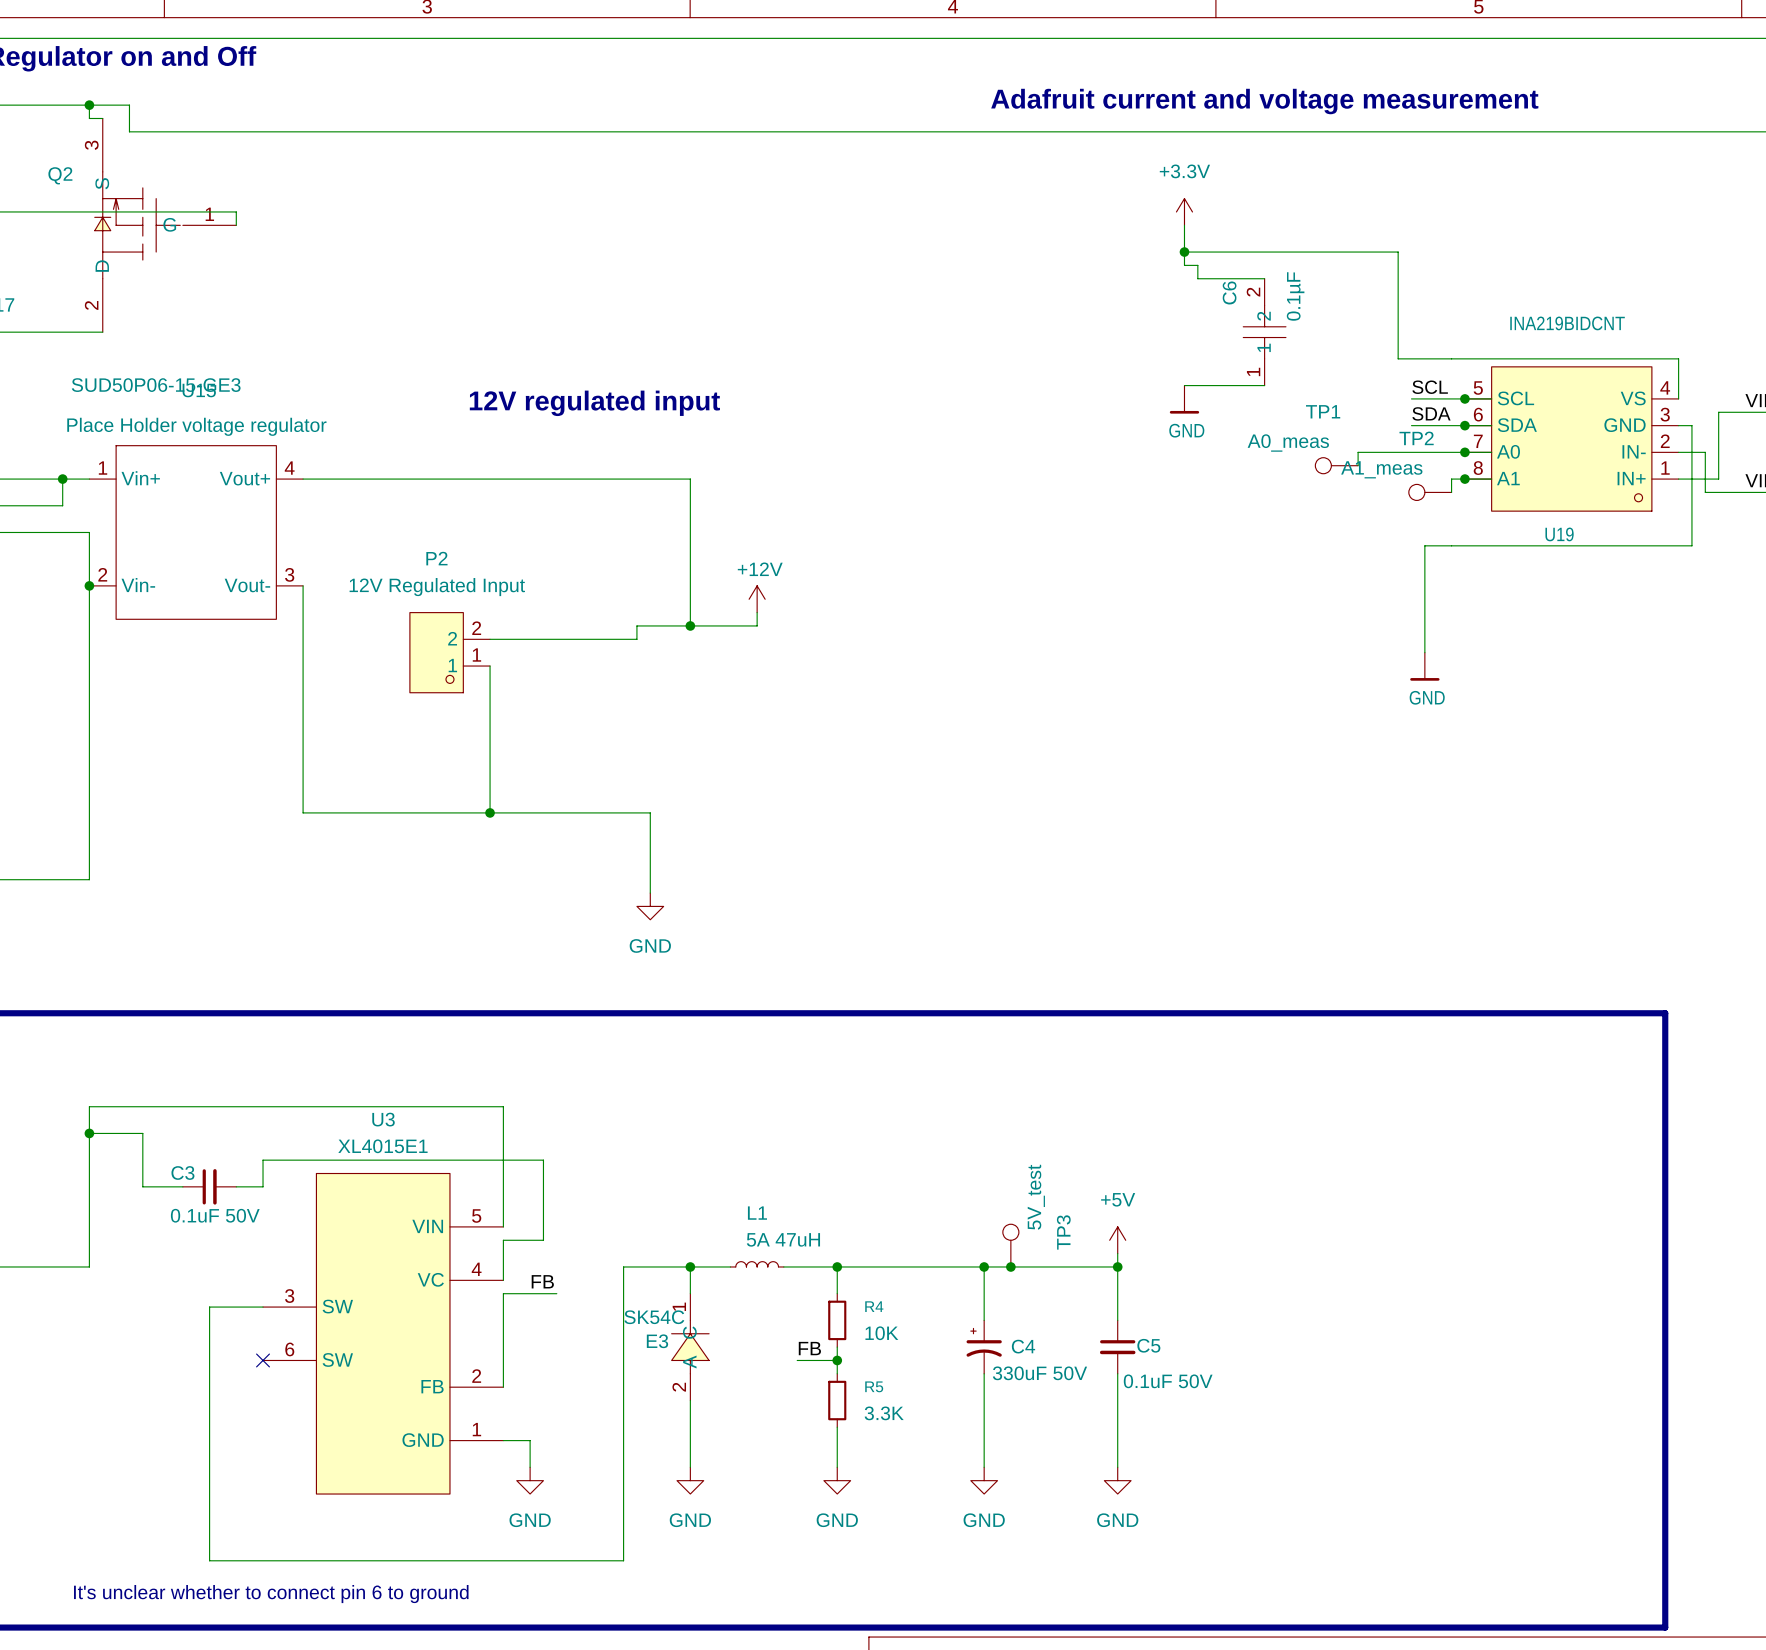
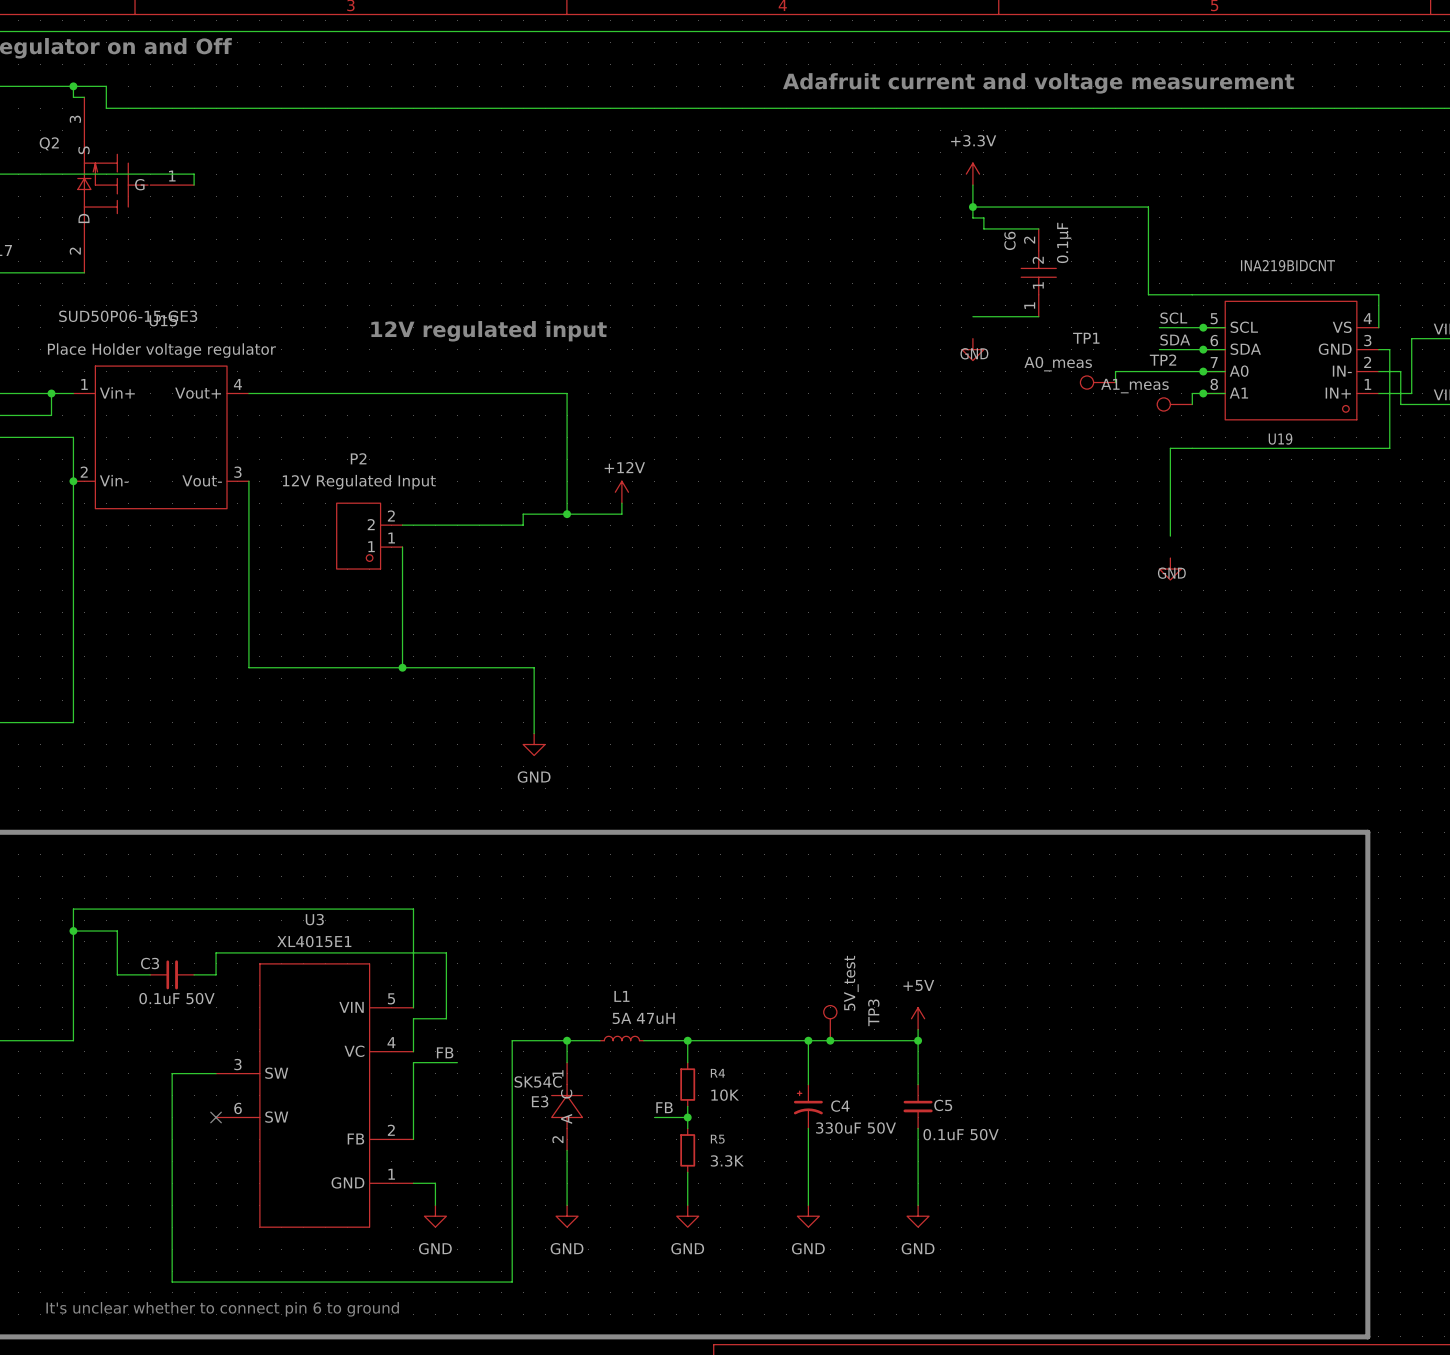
power symbol: GND (1184, 399) -> none
power symbol: none -> GND (972, 349)
power symbol: GND (1424, 666) -> none
power symbol: none -> GND (1170, 569)

